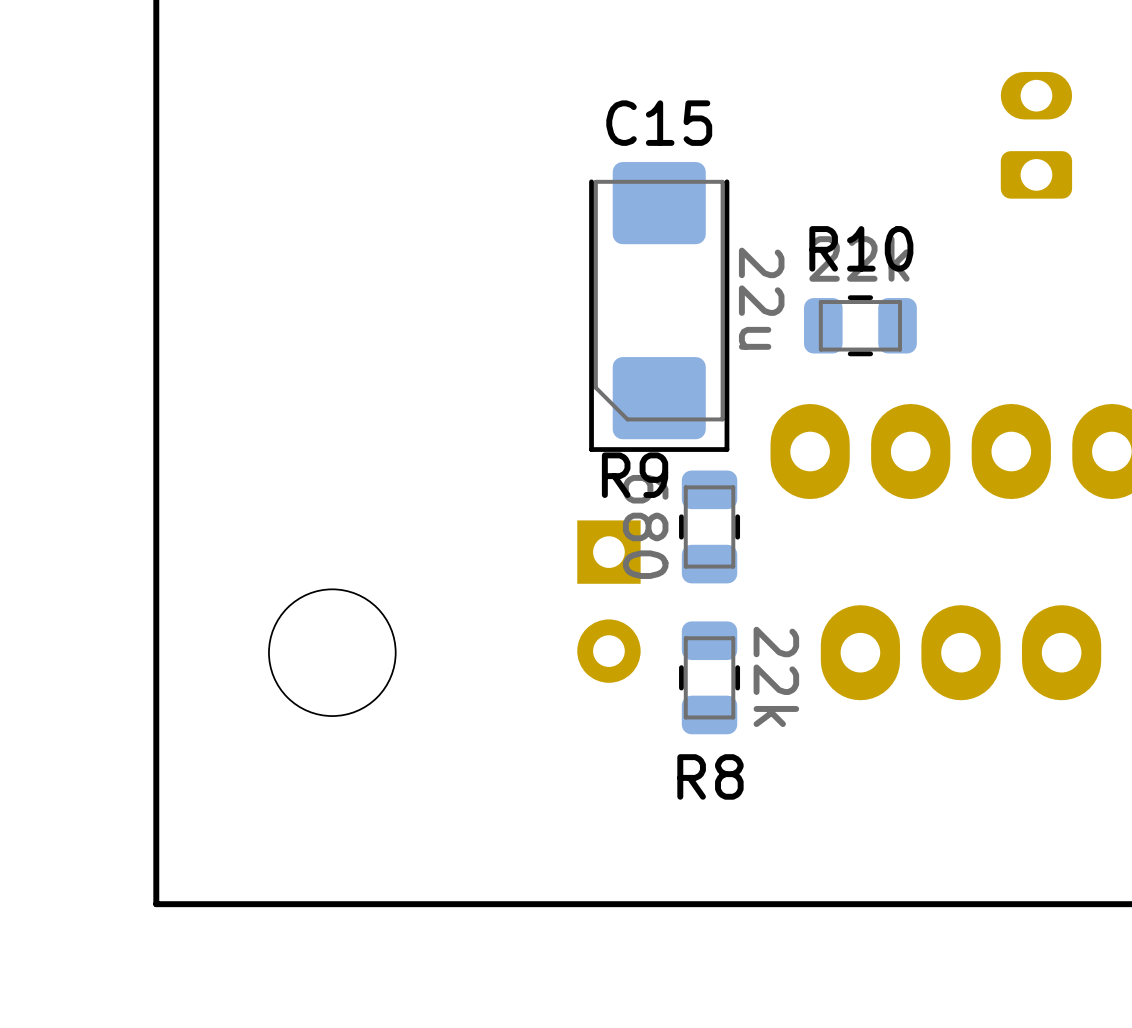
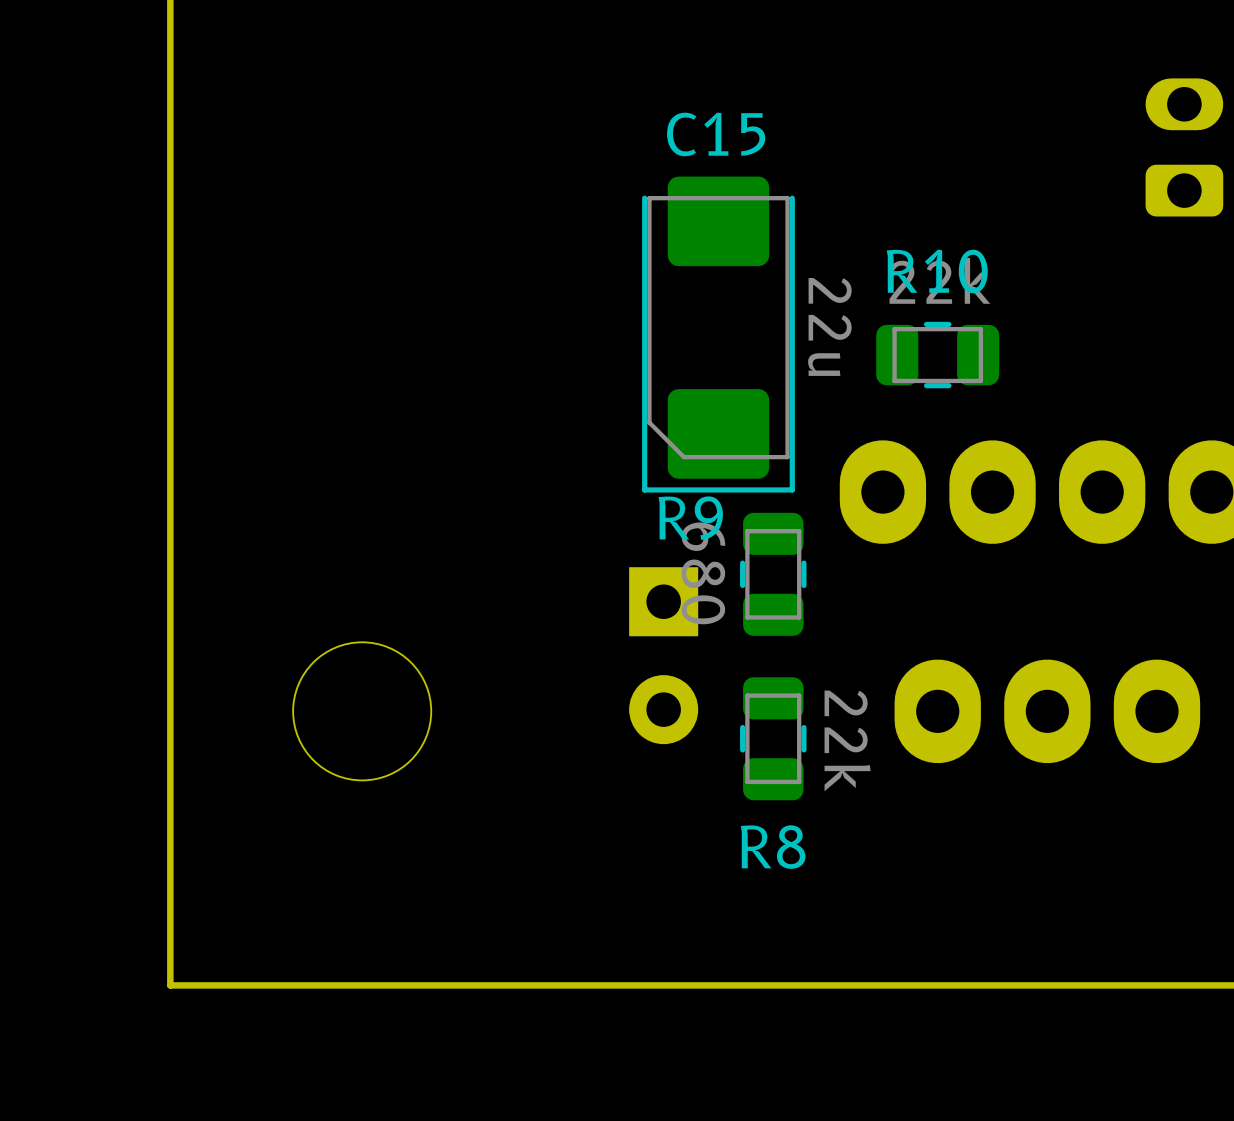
part position: (1036, 135) -> (1184, 147)

